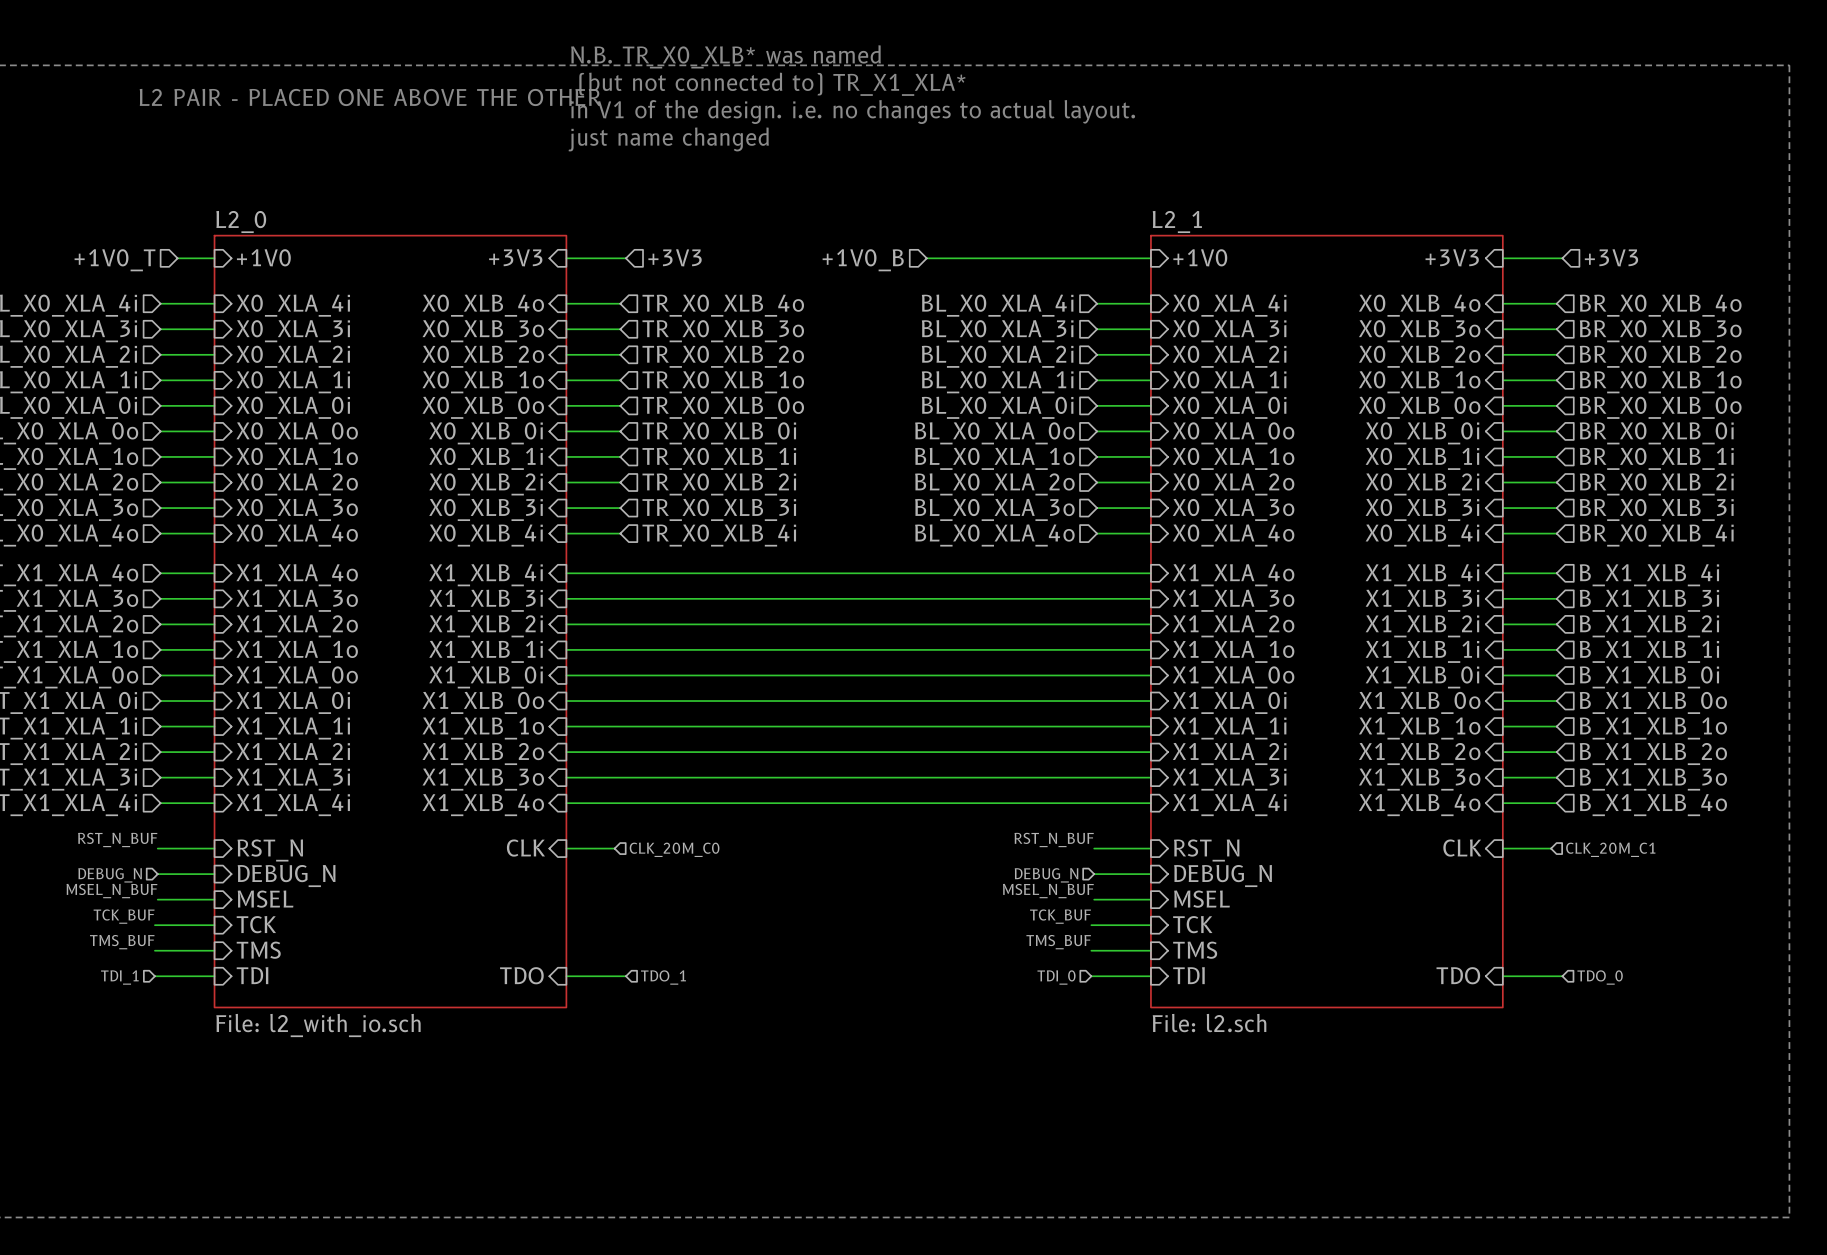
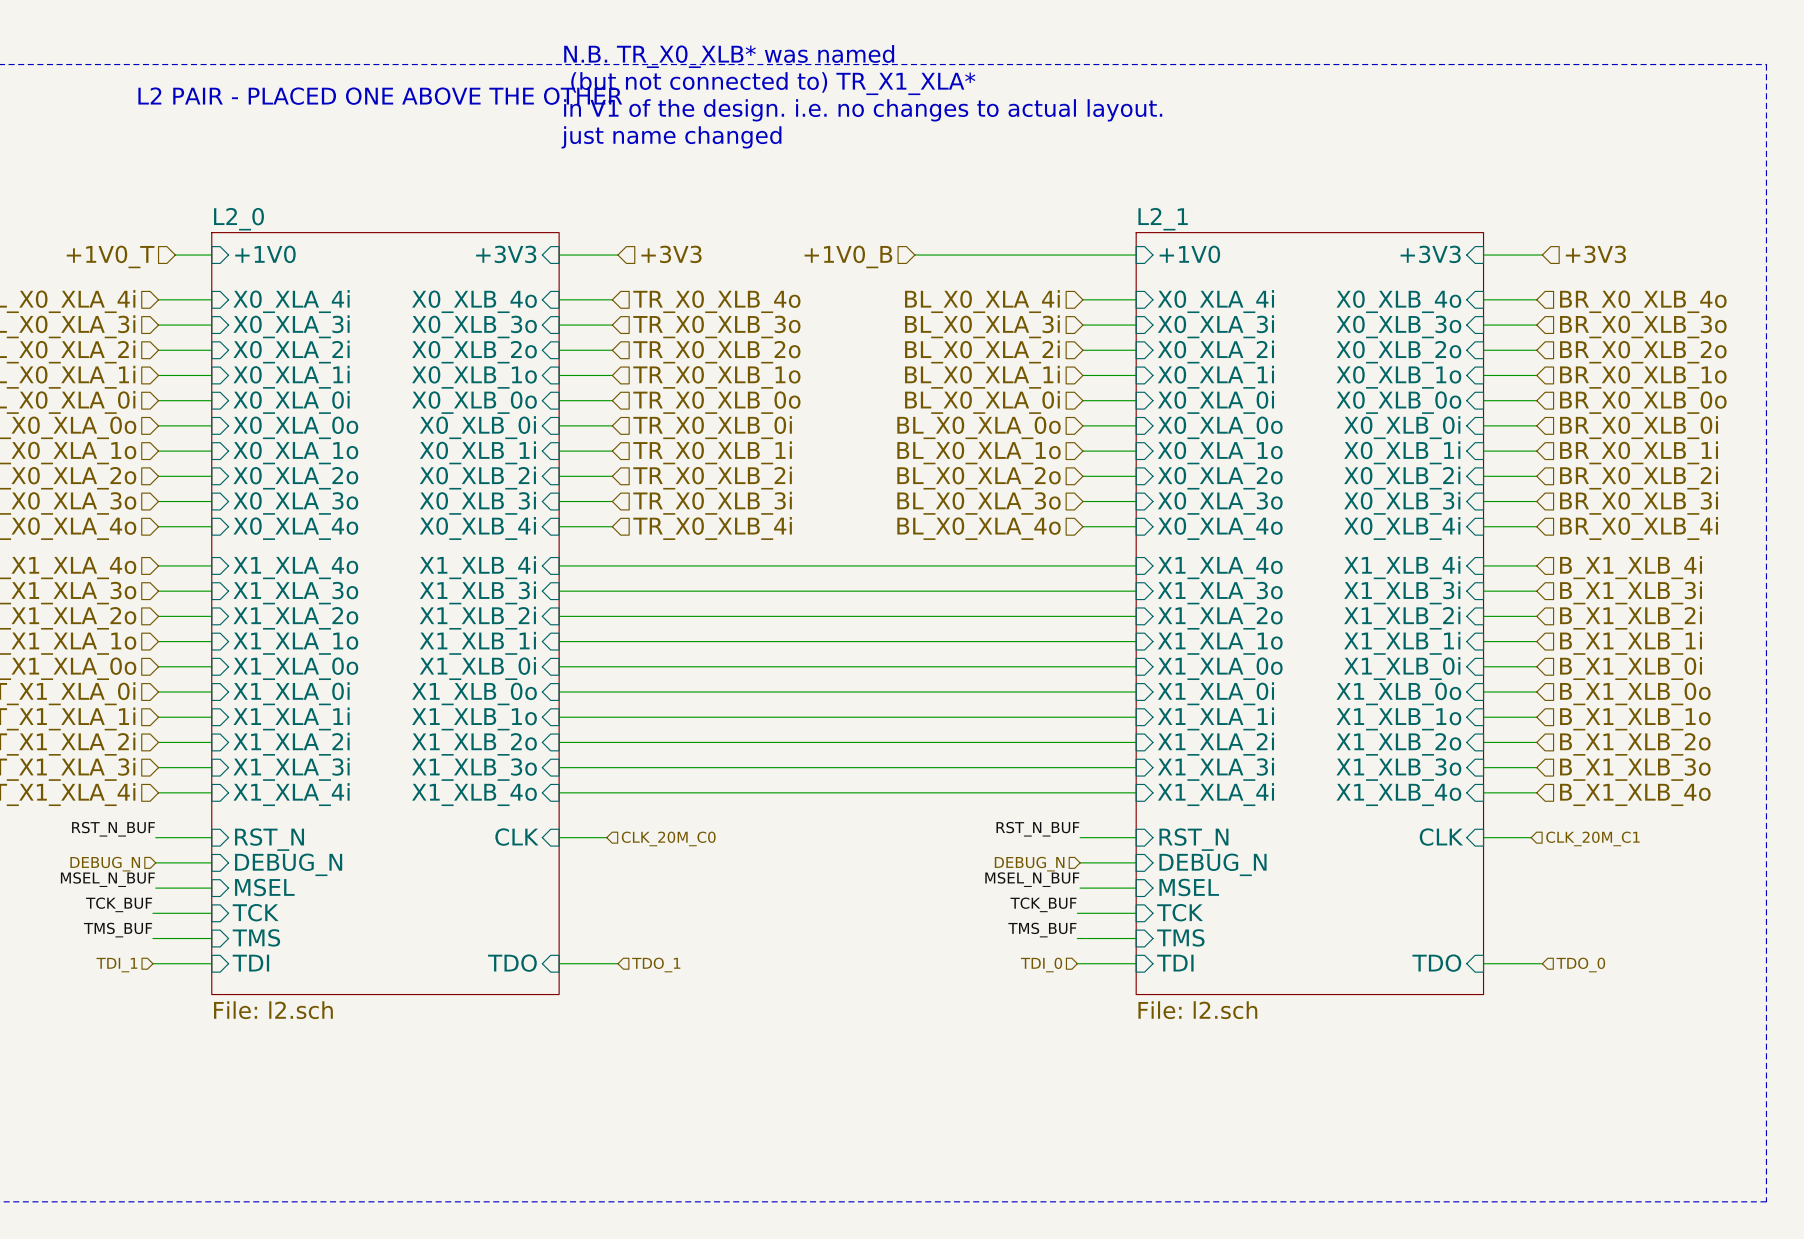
sheet L2_0 value: File: l2_with_io.sch (318, 1025) -> File: l2.sch (273, 1010)

